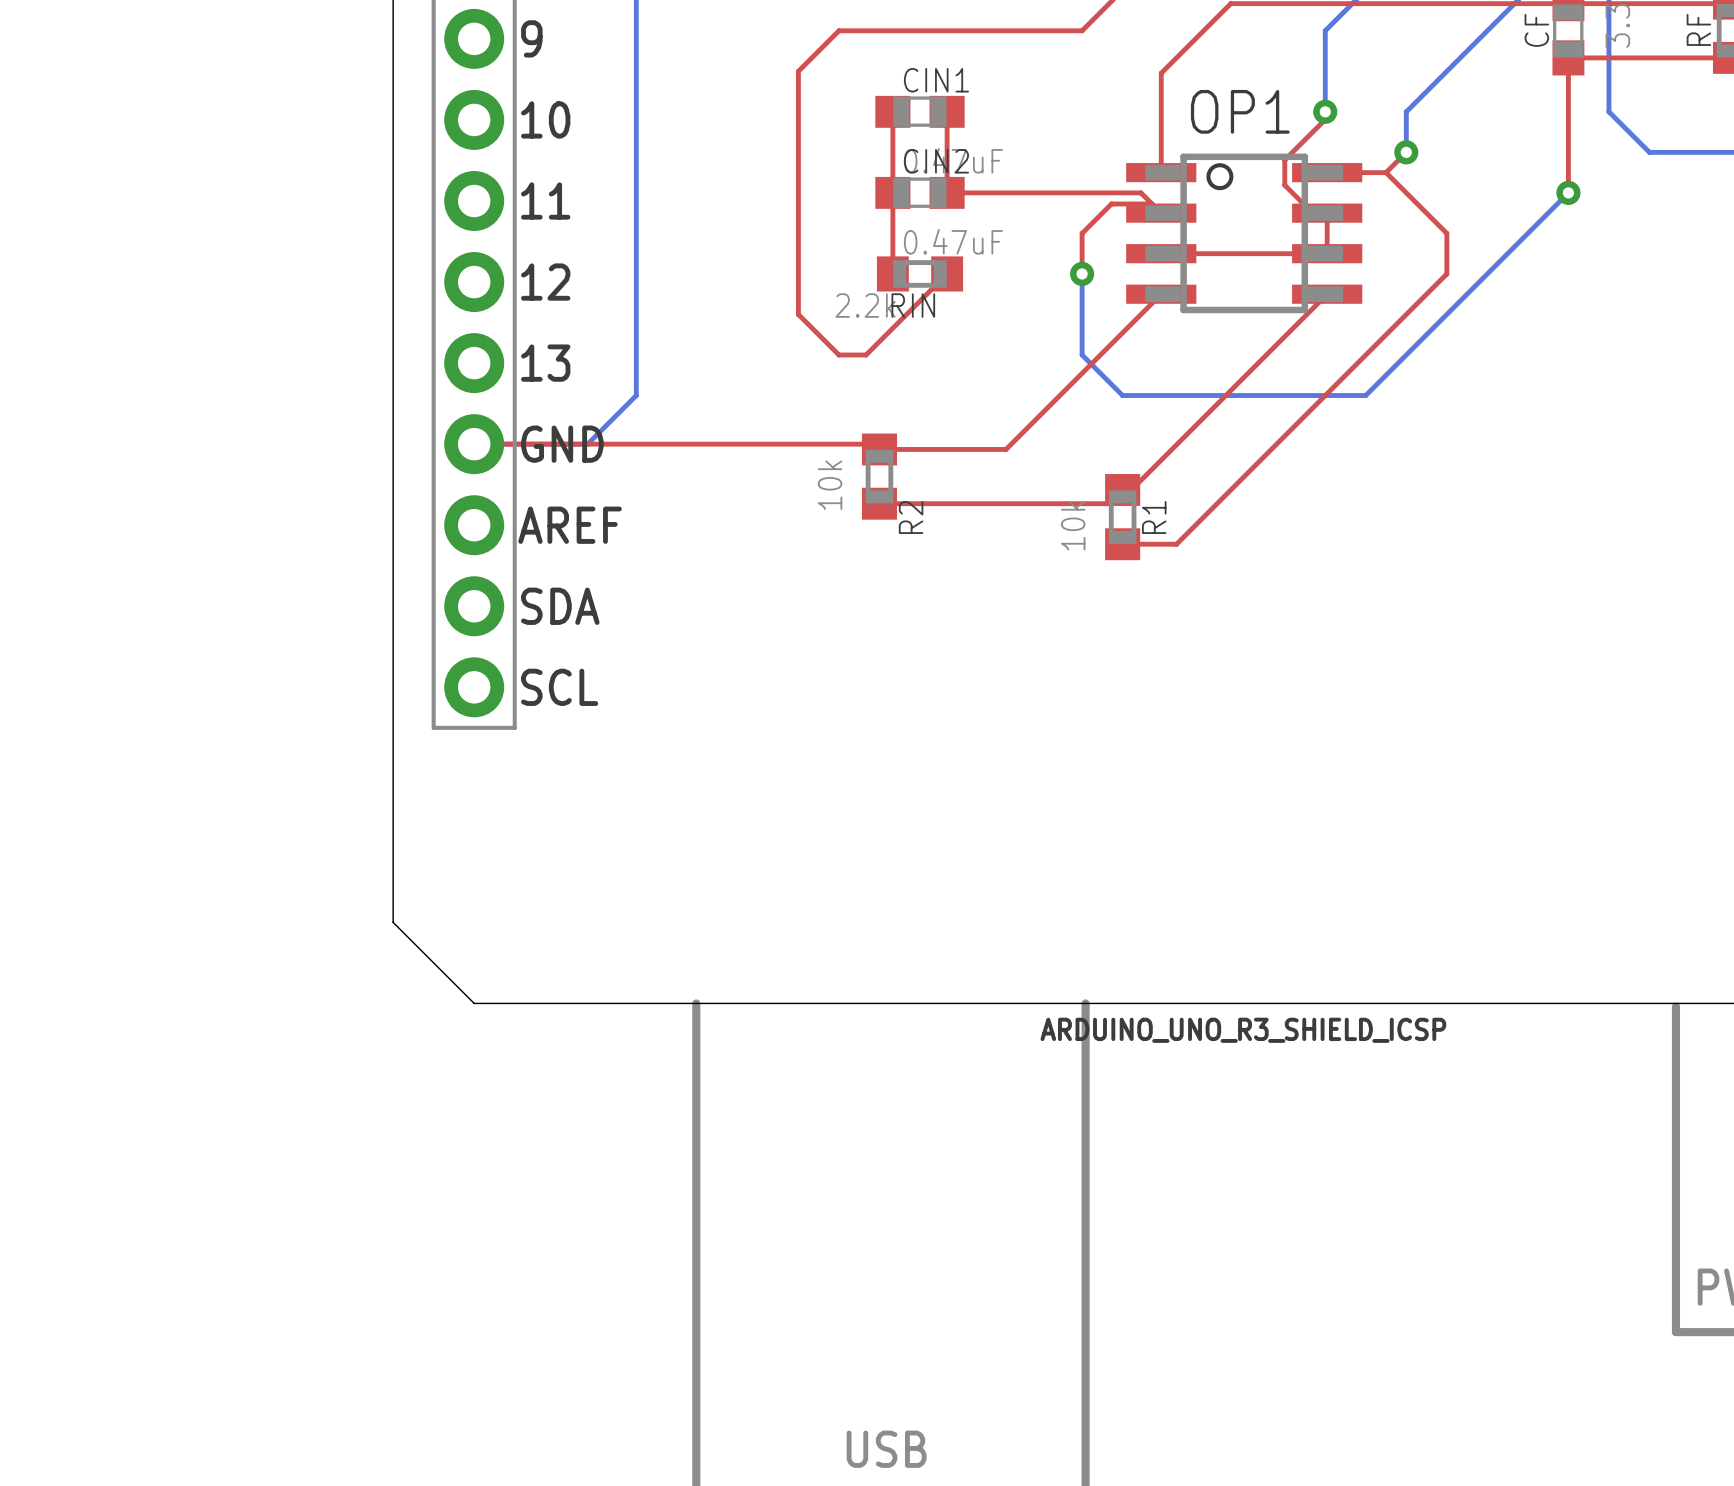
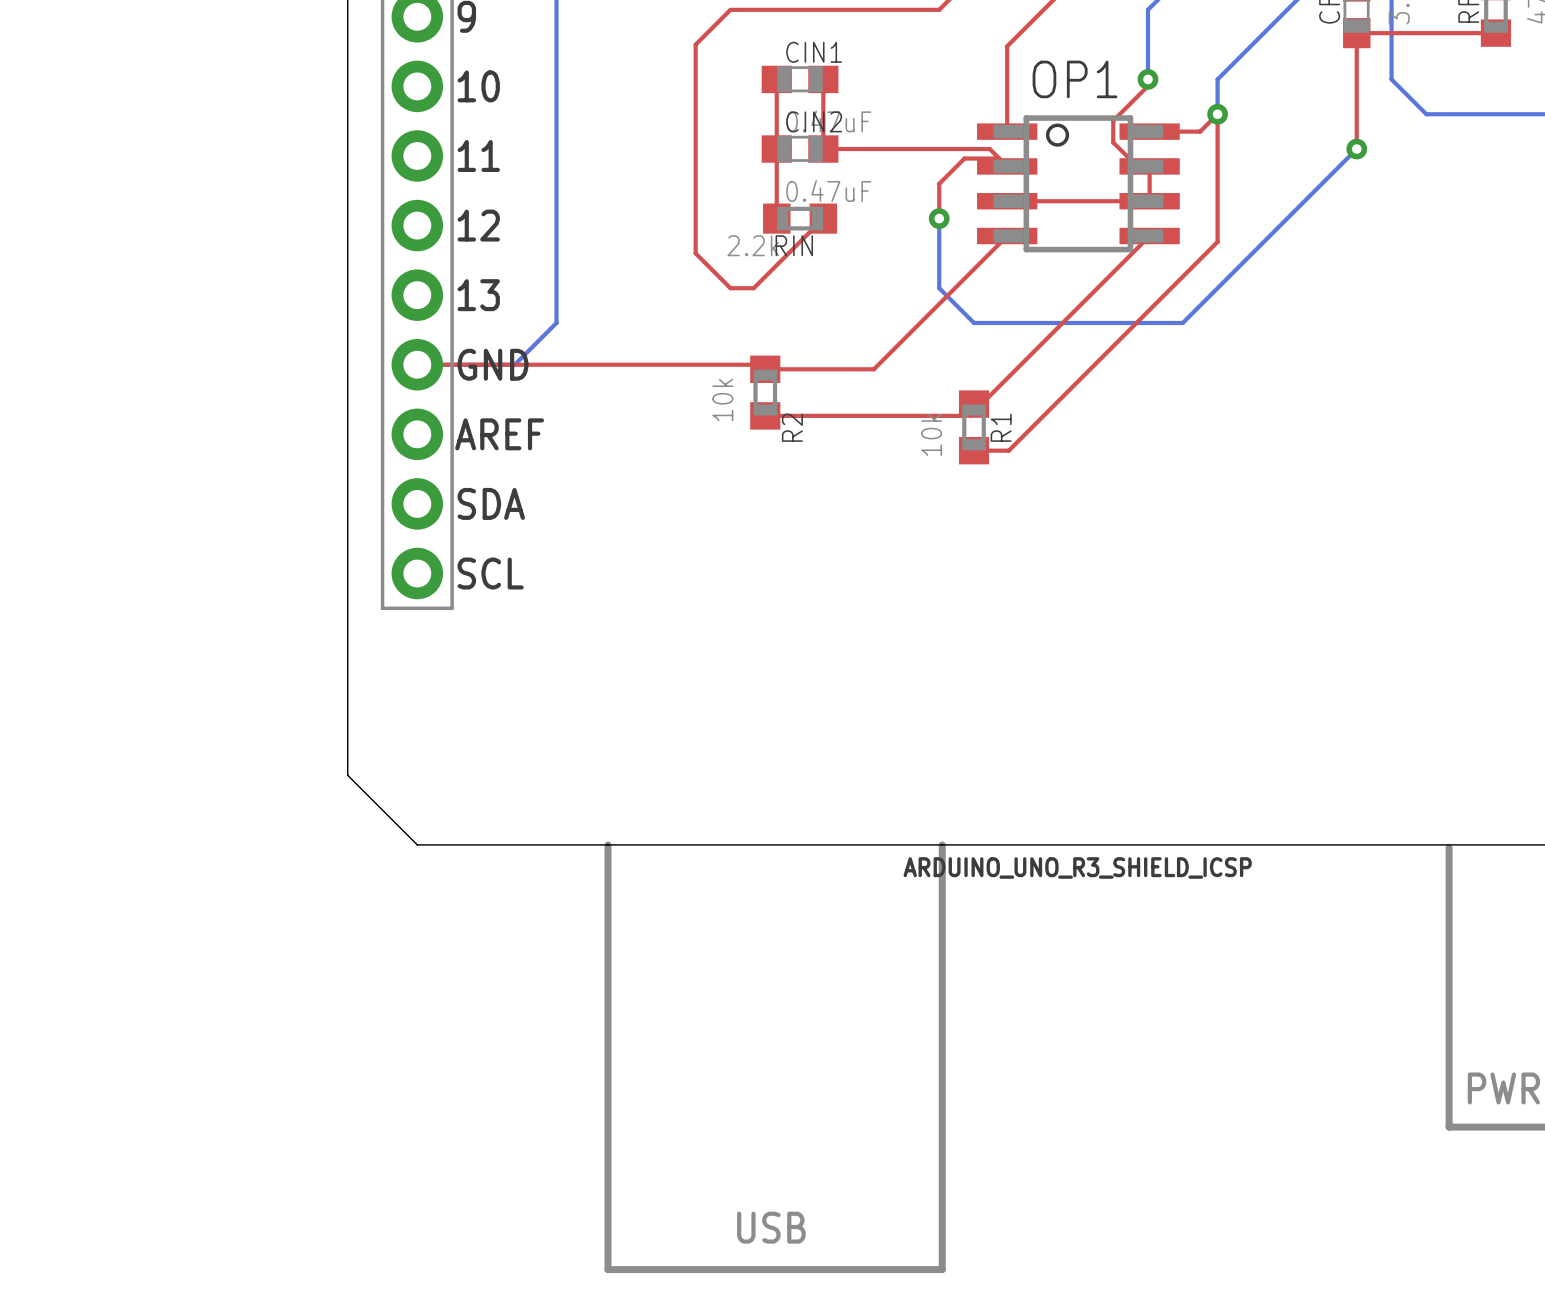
top track: (1386, 172) (1446, 233) (1446, 273) (1176, 544) (1163, 544) -> (1217, 114) (1217, 241) (1008, 450)

